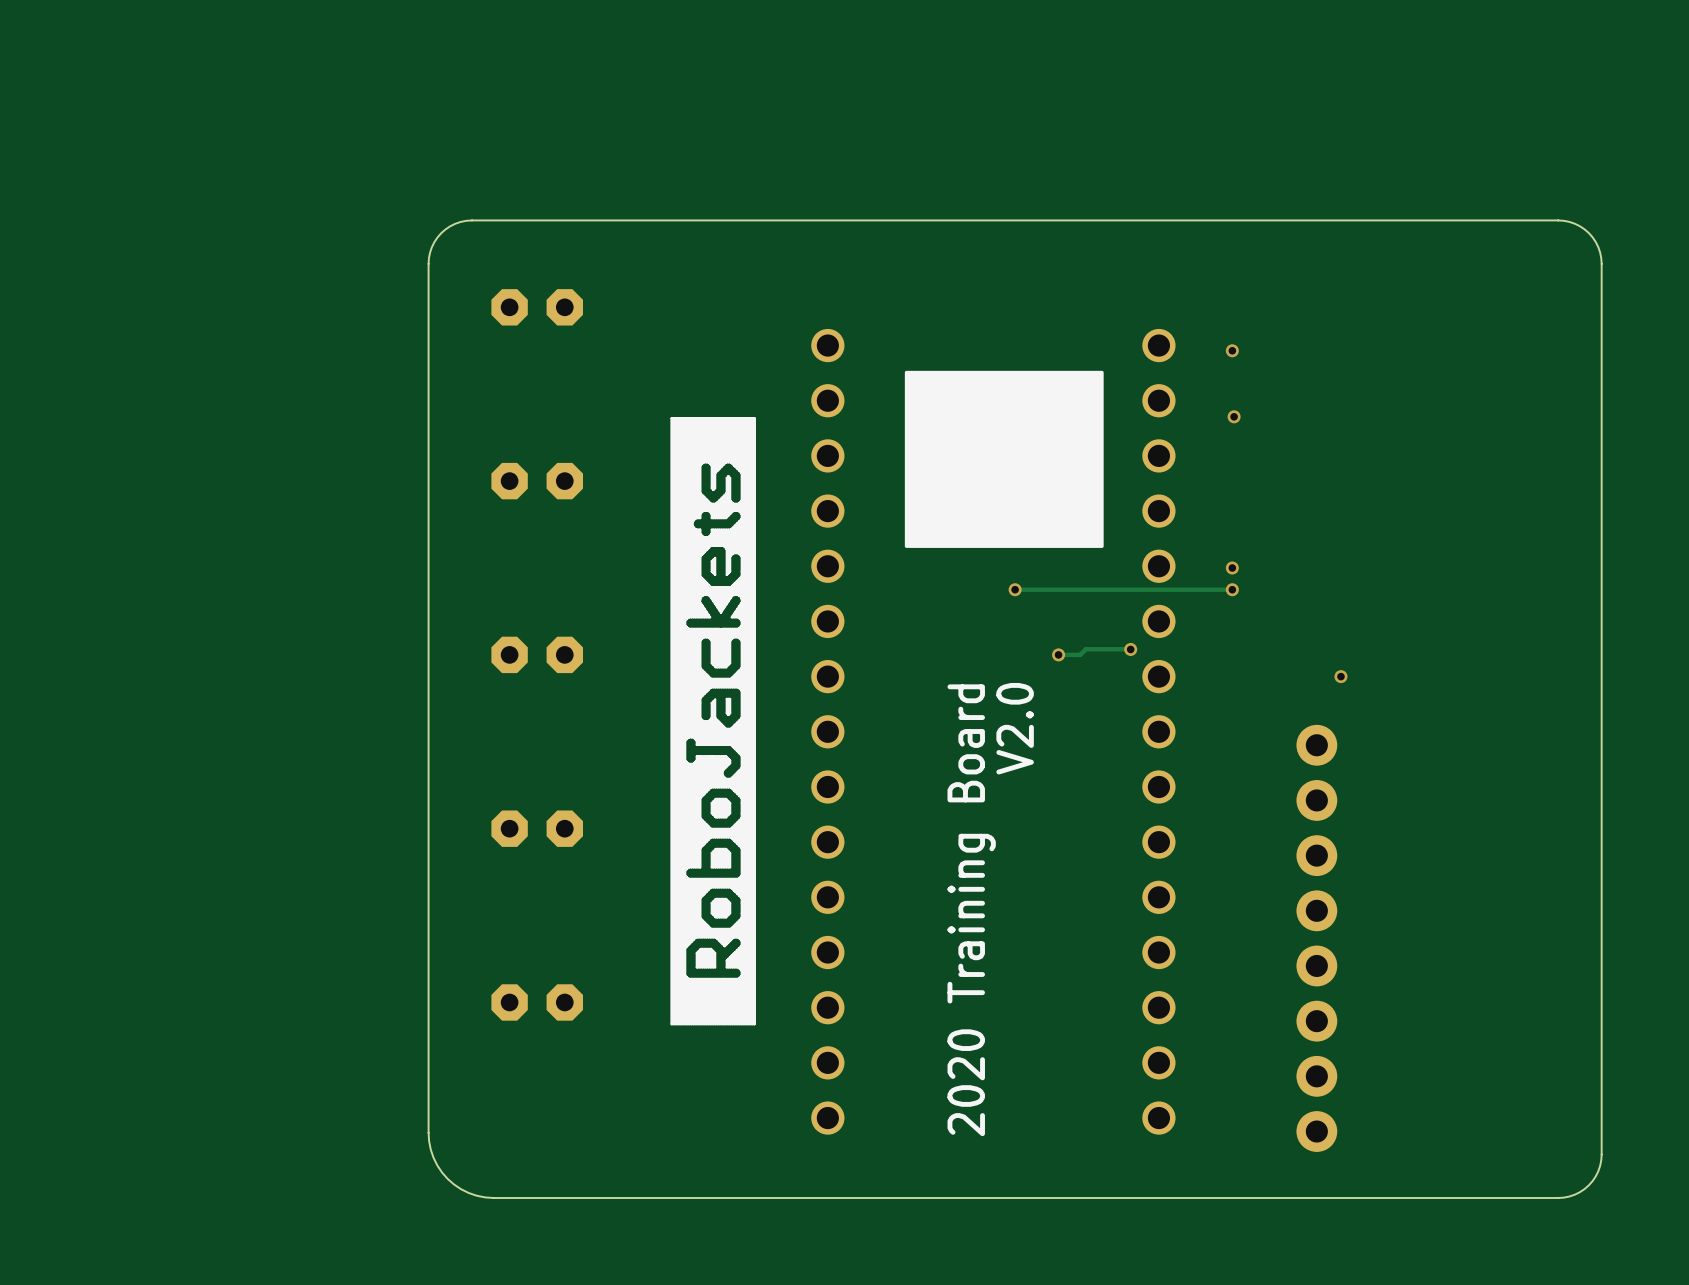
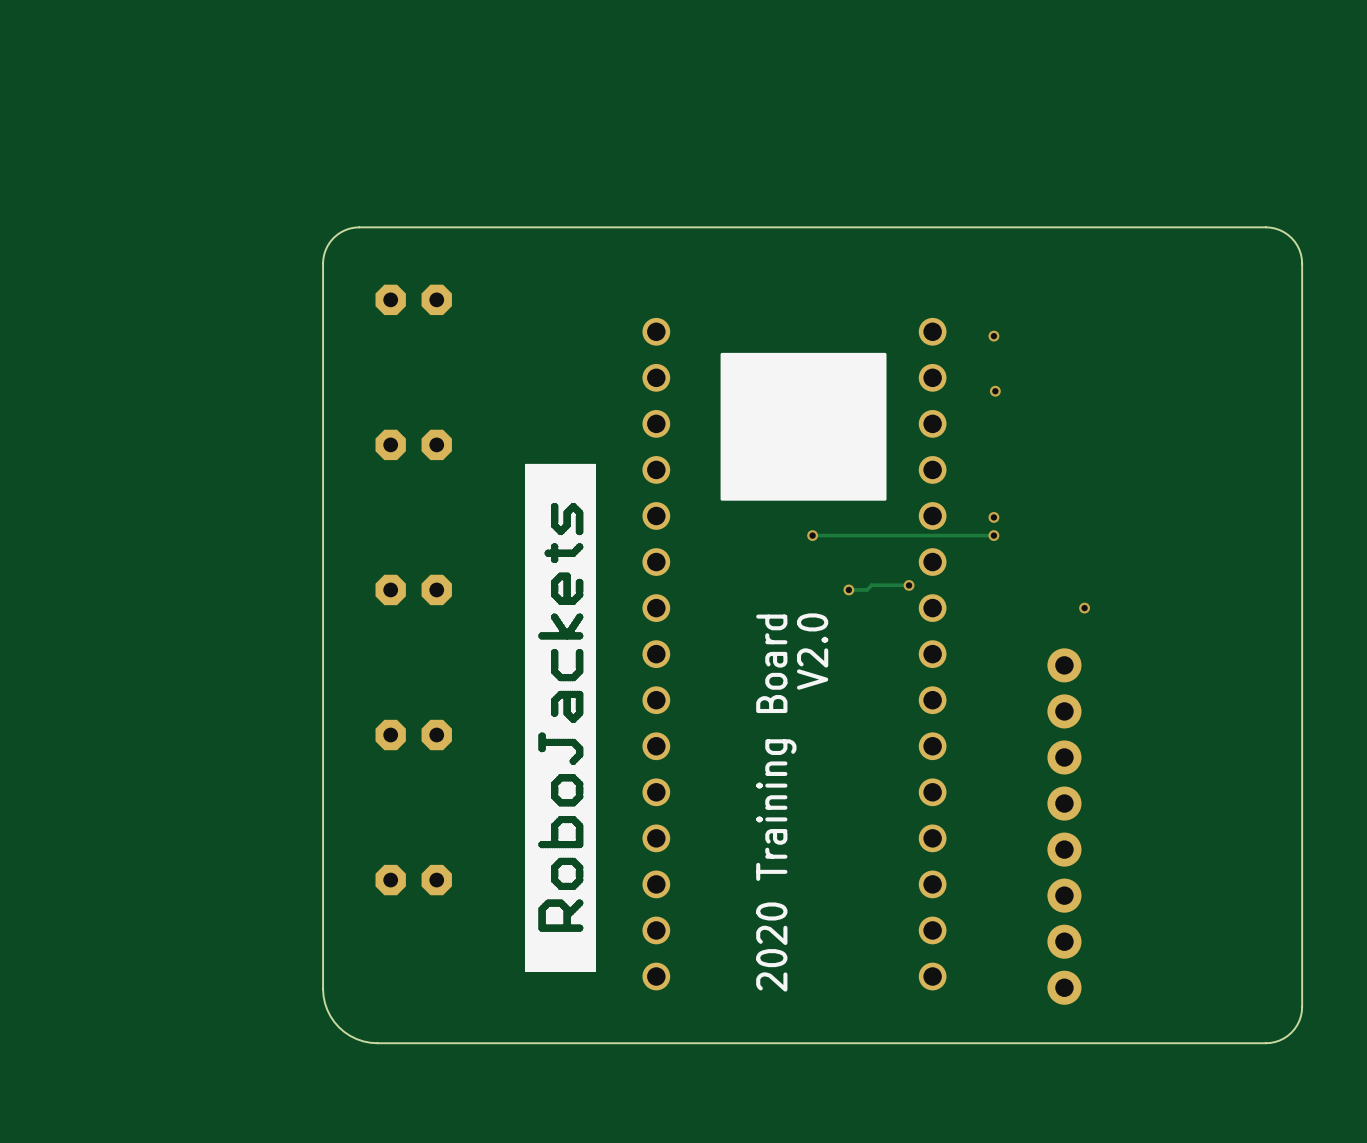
drawing position: (713, 721) -> (560, 717)

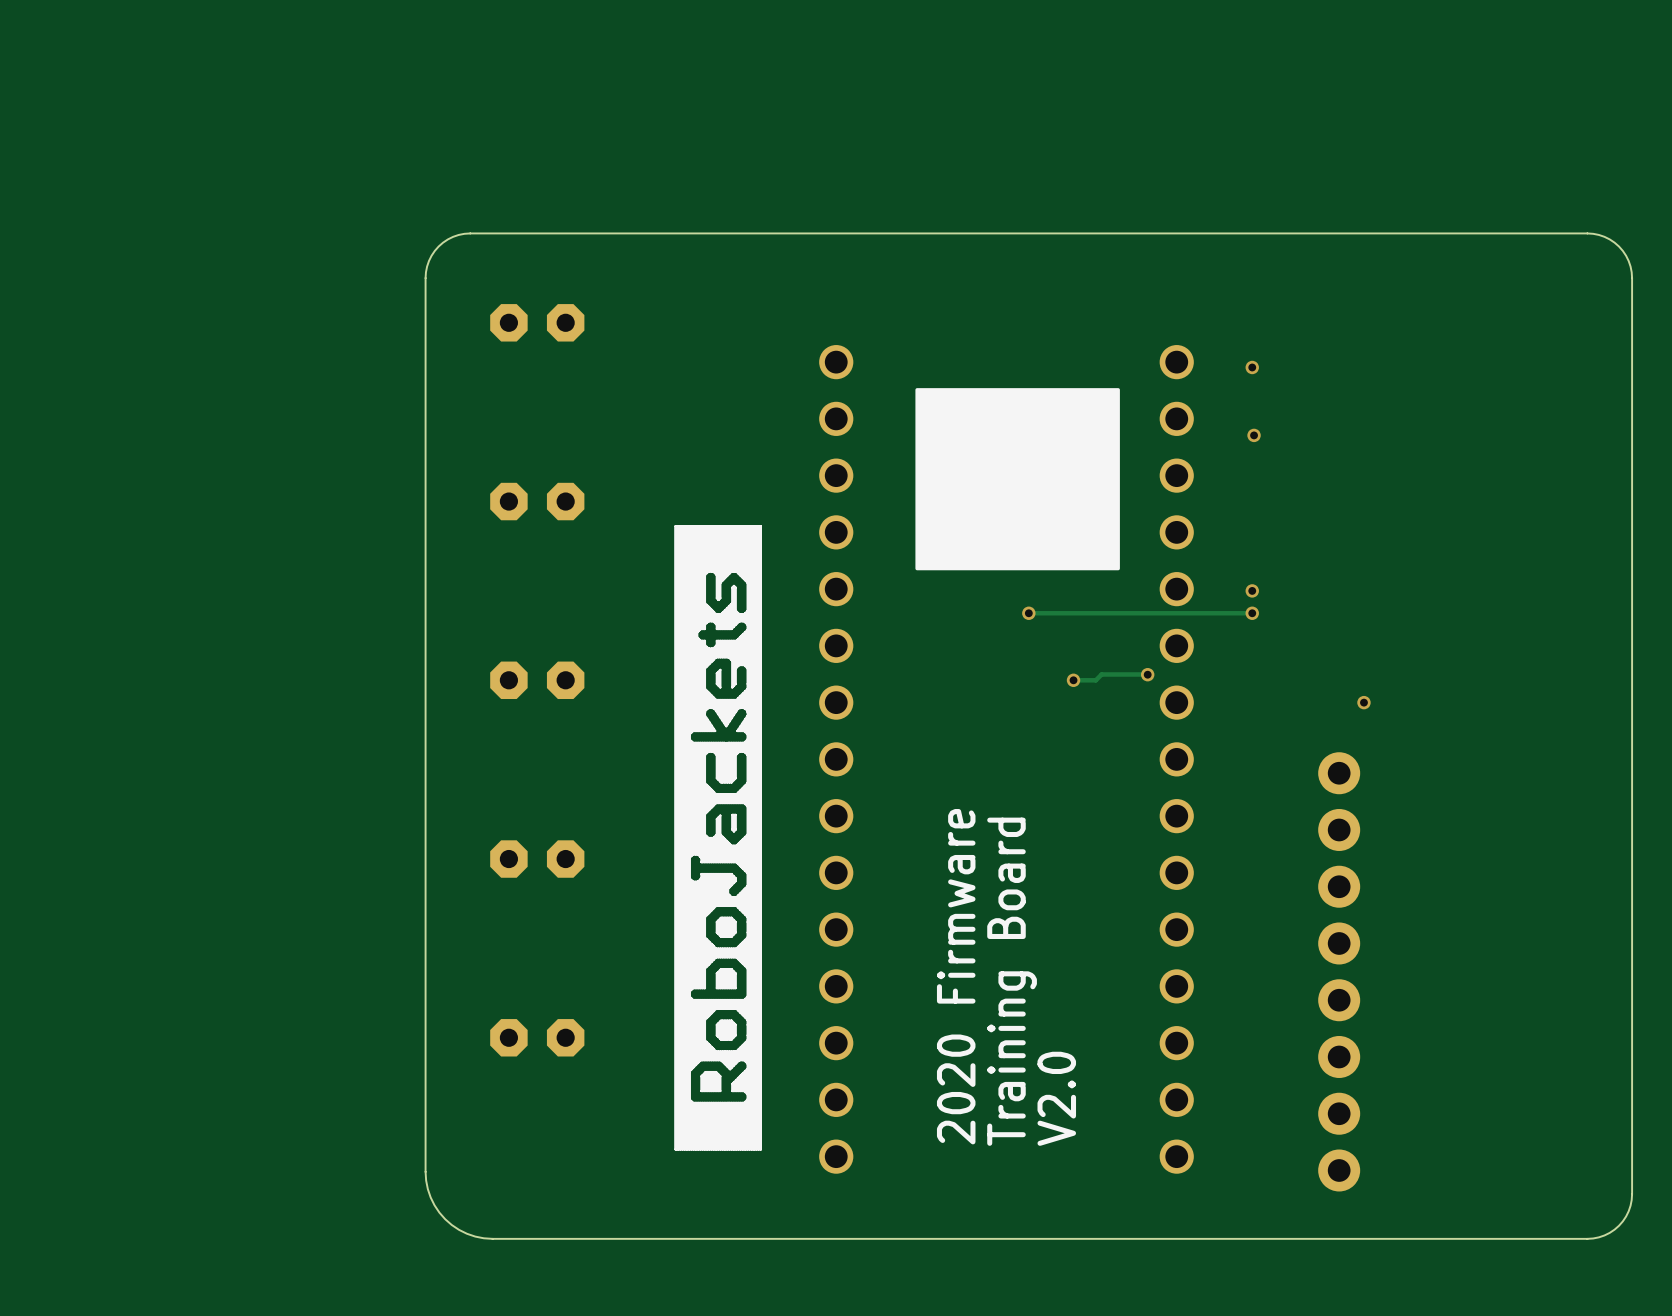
text position: V2.0 (812, 651) -> V2.0 (1056, 1098)
text: 2020 Training Board (776, 803) -> Training Board (1012, 981)
text: none -> 2020 Firmware (956, 976)

